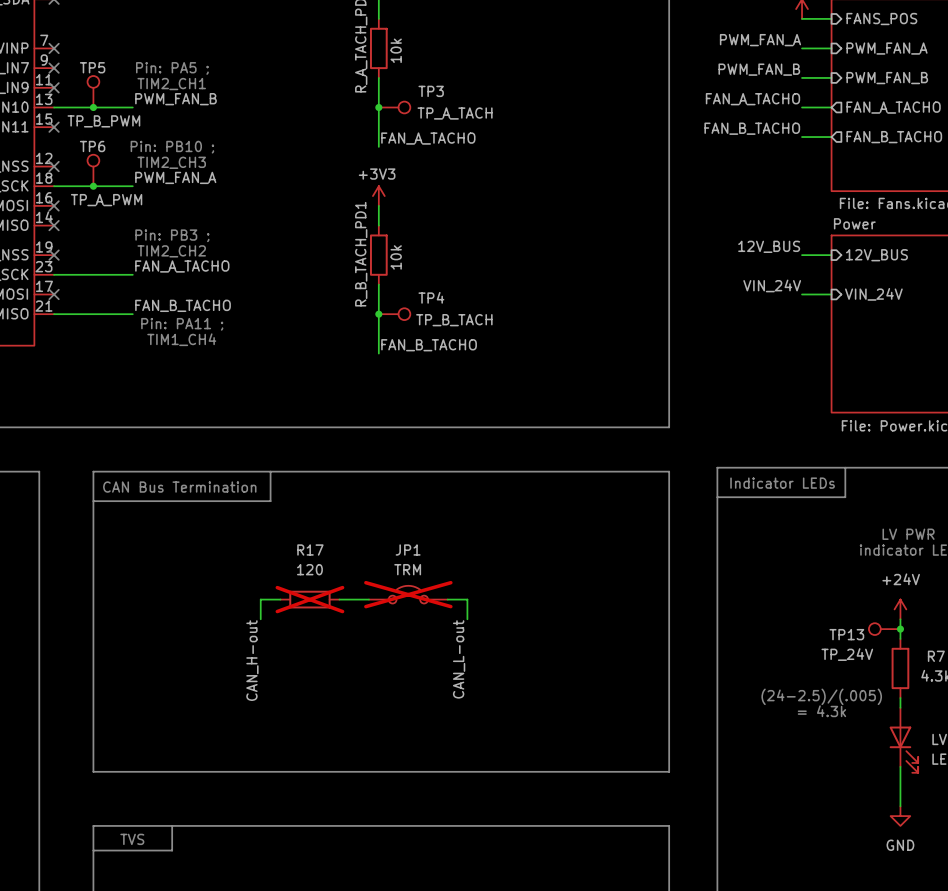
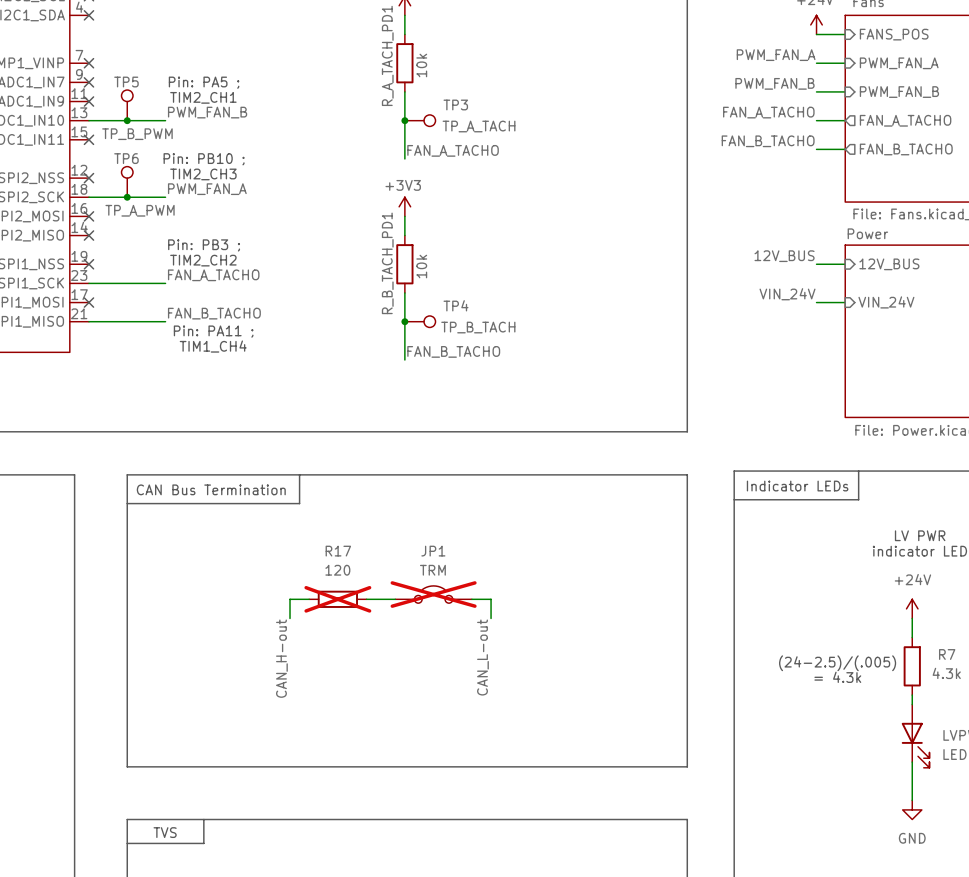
TP13: TP_24V (884, 629) -> none
junction: (900, 629) -> none
text position: (24-2.5)/(.005) (821, 696) -> (24-2.5)/(.005) (837, 663)
text position: = 4.3k (821, 711) -> = 4.3k (837, 677)

